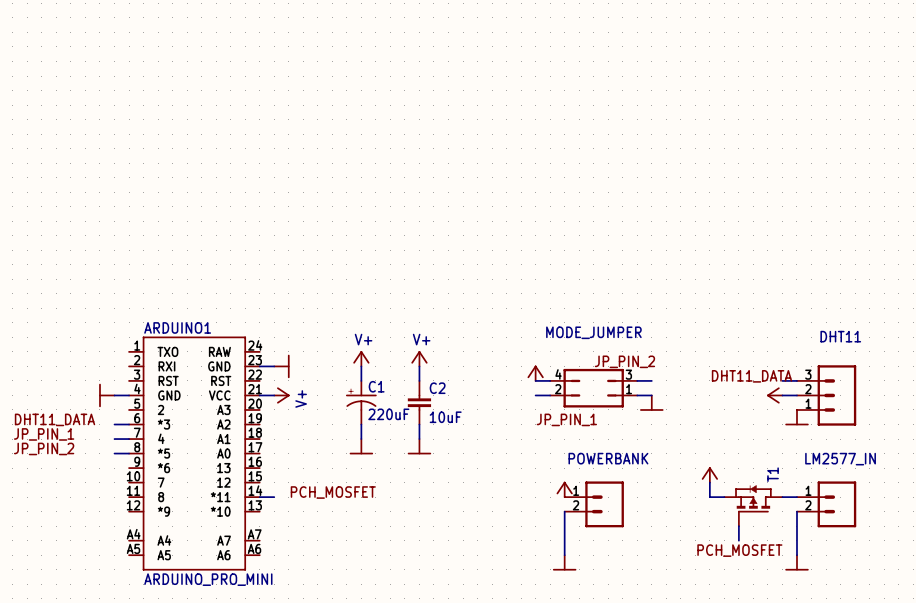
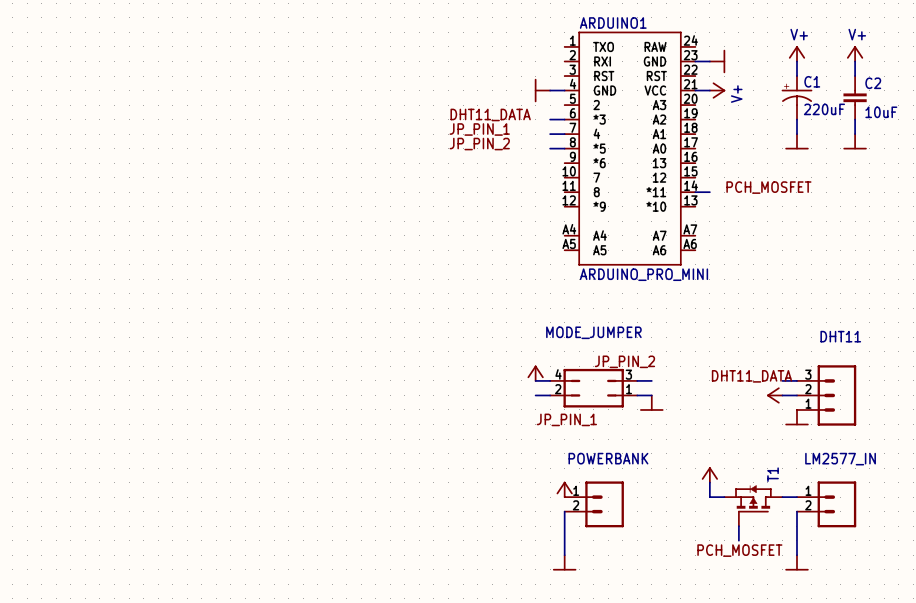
power symbol: none -> V+ (796, 53)
power symbol: none -> V+ (855, 53)
wire: none -> (695, 61) (709, 61)
power symbol: none -> (717, 61)
wire: none -> (796, 61) (796, 76)
wire: none -> (855, 61) (855, 76)
power symbol: none -> (542, 90)
wire: none -> (550, 90) (564, 90)
wire: none -> (695, 90) (709, 90)
power symbol: none -> V+ (717, 90)
label: none -> DHT11_DATA (490, 114)
wire: none -> (550, 119) (564, 119)
wire: none -> (796, 119) (796, 134)
wire: none -> (855, 119) (855, 134)
label: none -> JP_PIN_1 (479, 129)
wire: none -> (550, 134) (564, 134)
power symbol: none -> (796, 141)
power symbol: none -> (855, 141)
label: none -> JP_PIN_2 (479, 144)
wire: none -> (550, 148) (564, 148)
label: none -> PCH_MOSFET (768, 187)
wire: none -> (695, 192) (709, 192)
power symbol: V+ (361, 358) -> none
power symbol: V+ (419, 358) -> none
wire: (259, 366) (274, 366) -> none
power symbol: (281, 366) -> none
wire: (361, 366) (361, 380) -> none
wire: (419, 366) (419, 380) -> none
power symbol: (106, 395) -> none
wire: (114, 395) (129, 395) -> none
wire: (259, 395) (274, 395) -> none
power symbol: V+ (281, 395) -> none
C1 position: (361, 402) -> (796, 97)
C2 position: (419, 402) -> (855, 97)
label: DHT11_DATA (55, 419) -> none
wire: (114, 424) (129, 424) -> none
wire: (361, 424) (361, 439) -> none
wire: (419, 424) (419, 439) -> none
label: JP_PIN_1 (44, 434) -> none
wire: (114, 439) (129, 439) -> none
power symbol: (361, 446) -> none
power symbol: (419, 446) -> none
label: JP_PIN_2 (44, 448) -> none
wire: (114, 453) (129, 453) -> none
ARDUINO1 position: (194, 453) -> (630, 148)
label: PCH_MOSFET (333, 492) -> none
wire: (259, 497) (274, 497) -> none

